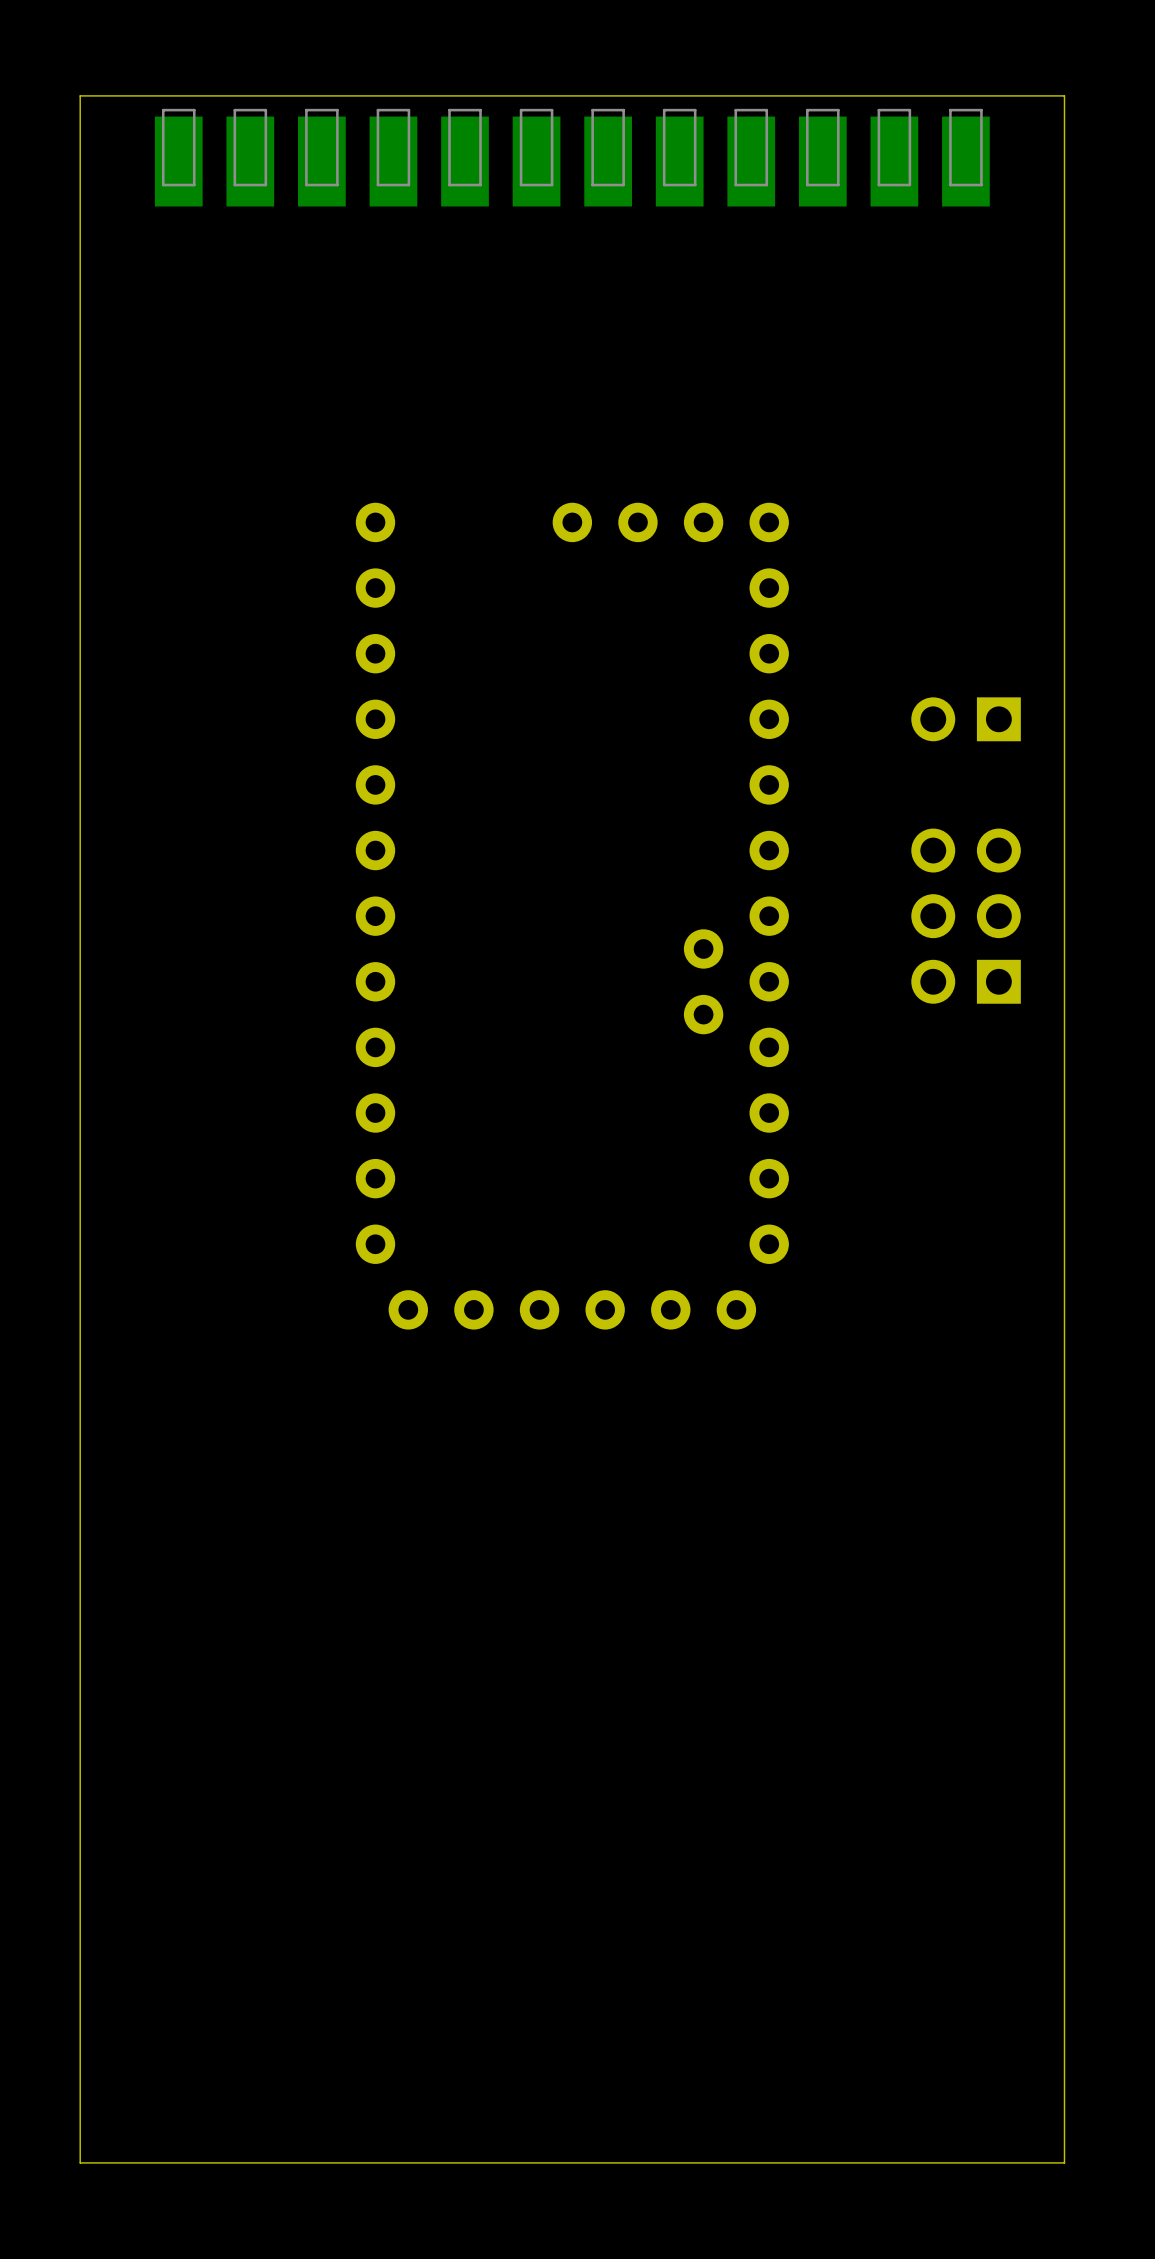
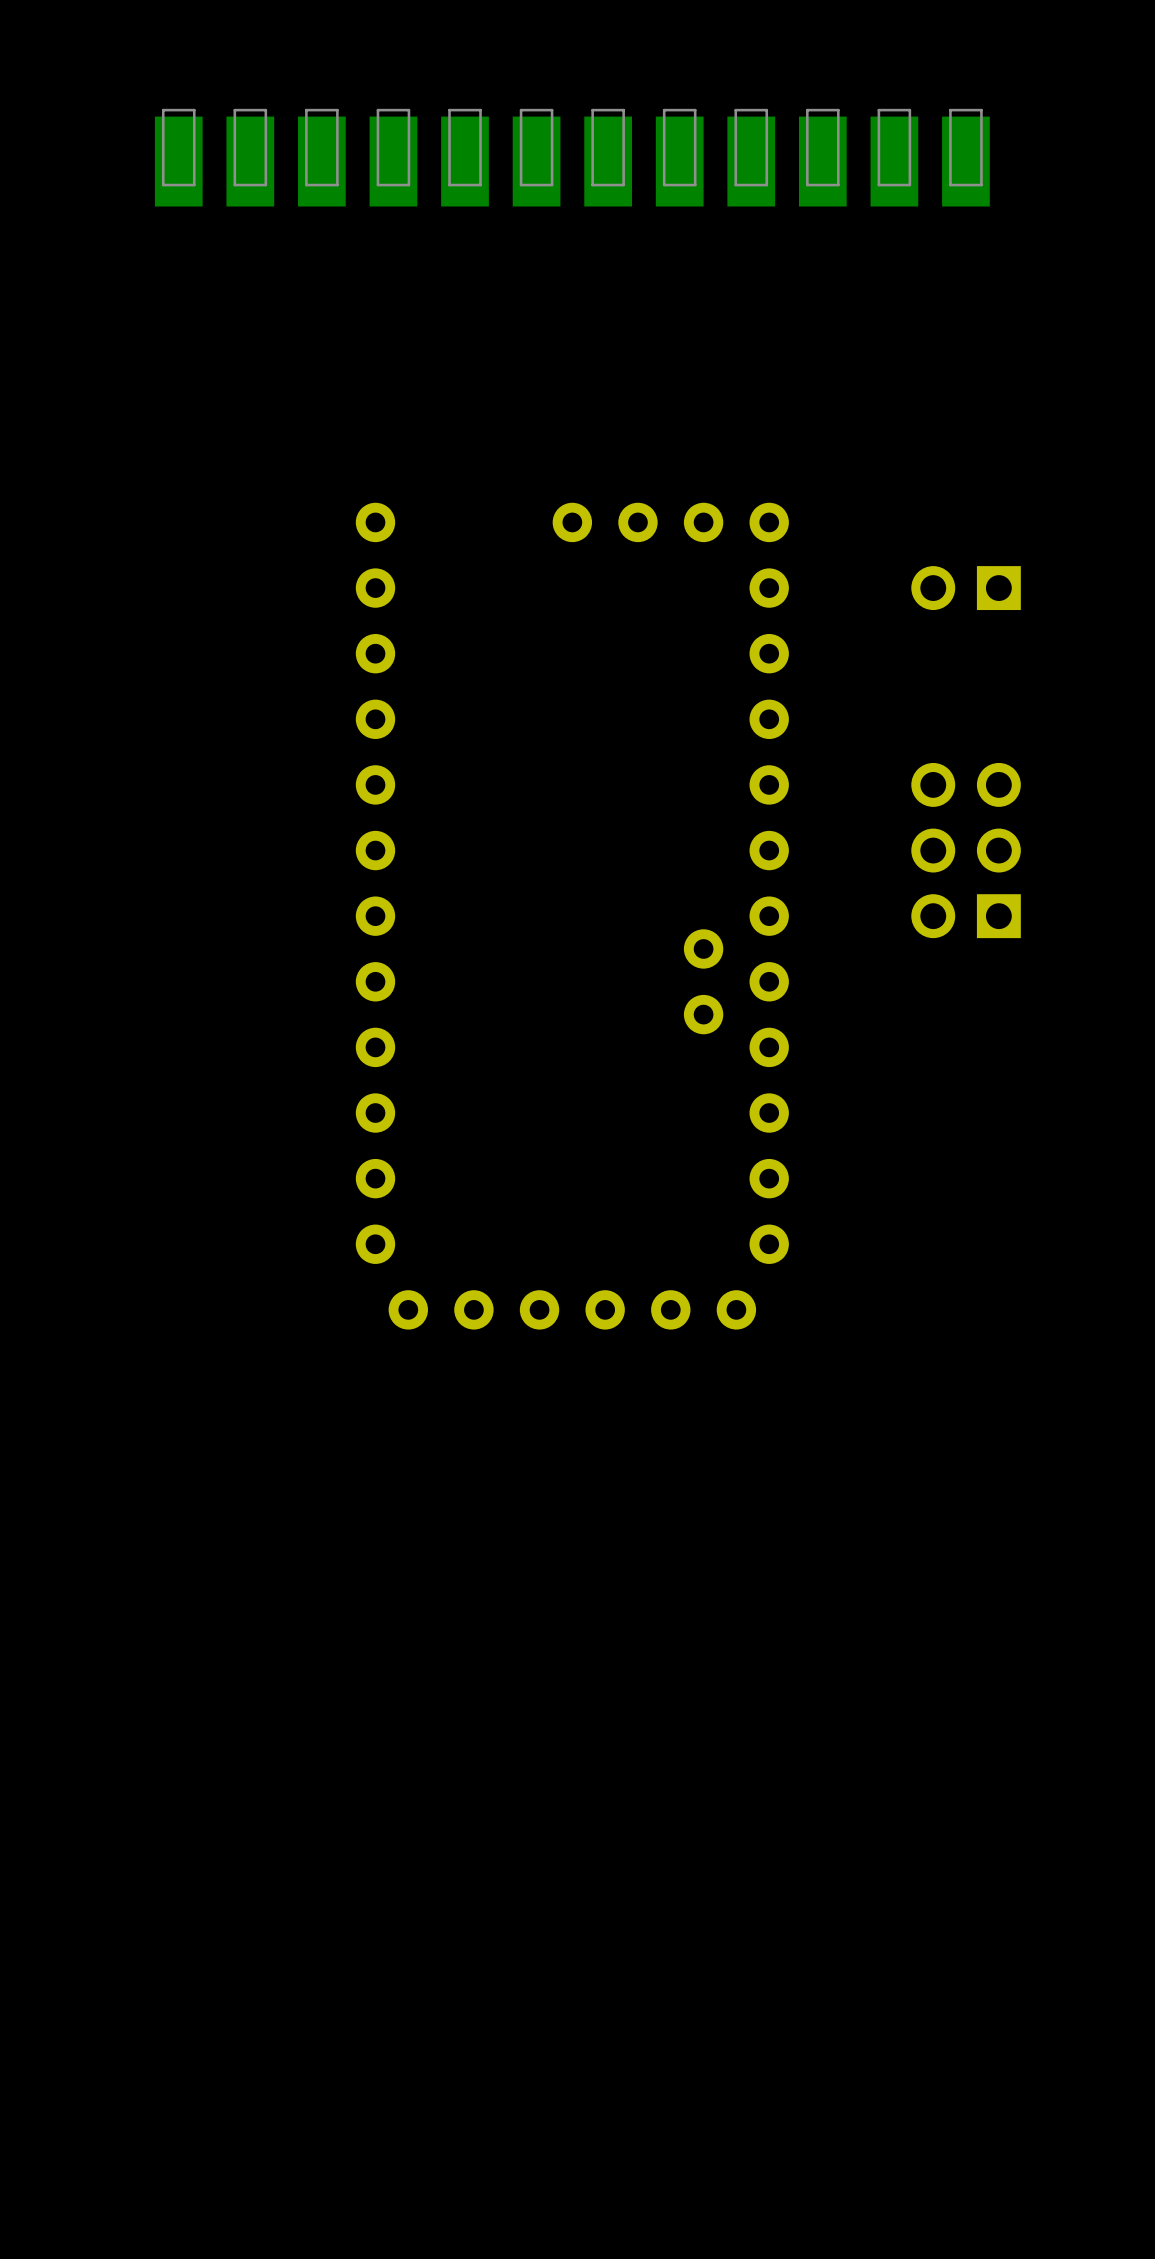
board edge: (1064, 95) (80, 95) (80, 2162) (1064, 2162) (1064, 95) -> none
part position: (966, 719) -> (966, 588)
part position: (966, 916) -> (966, 850)

